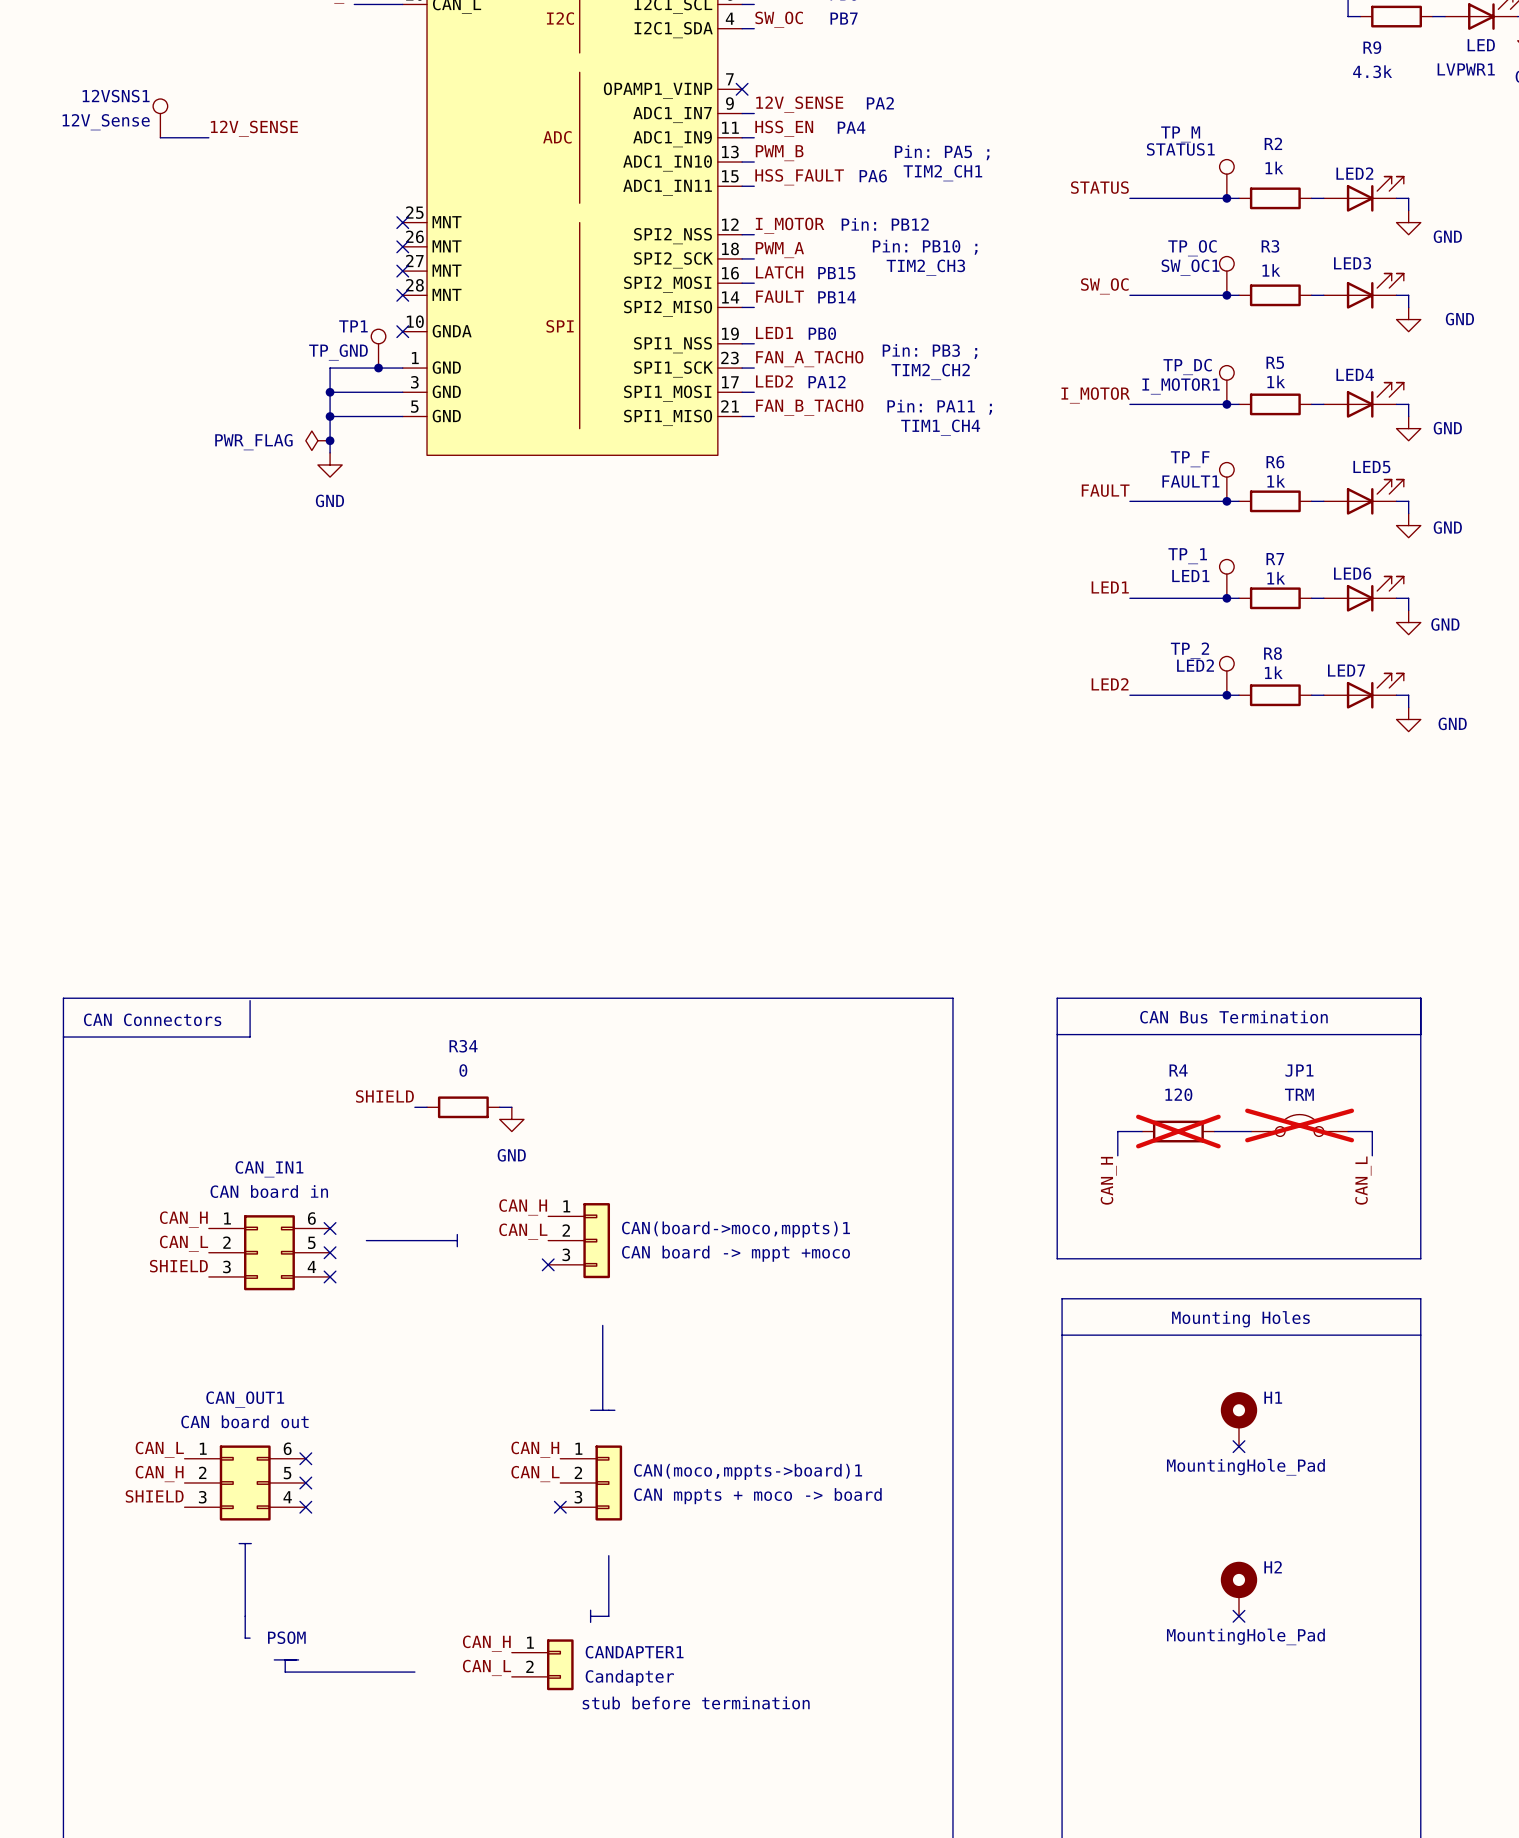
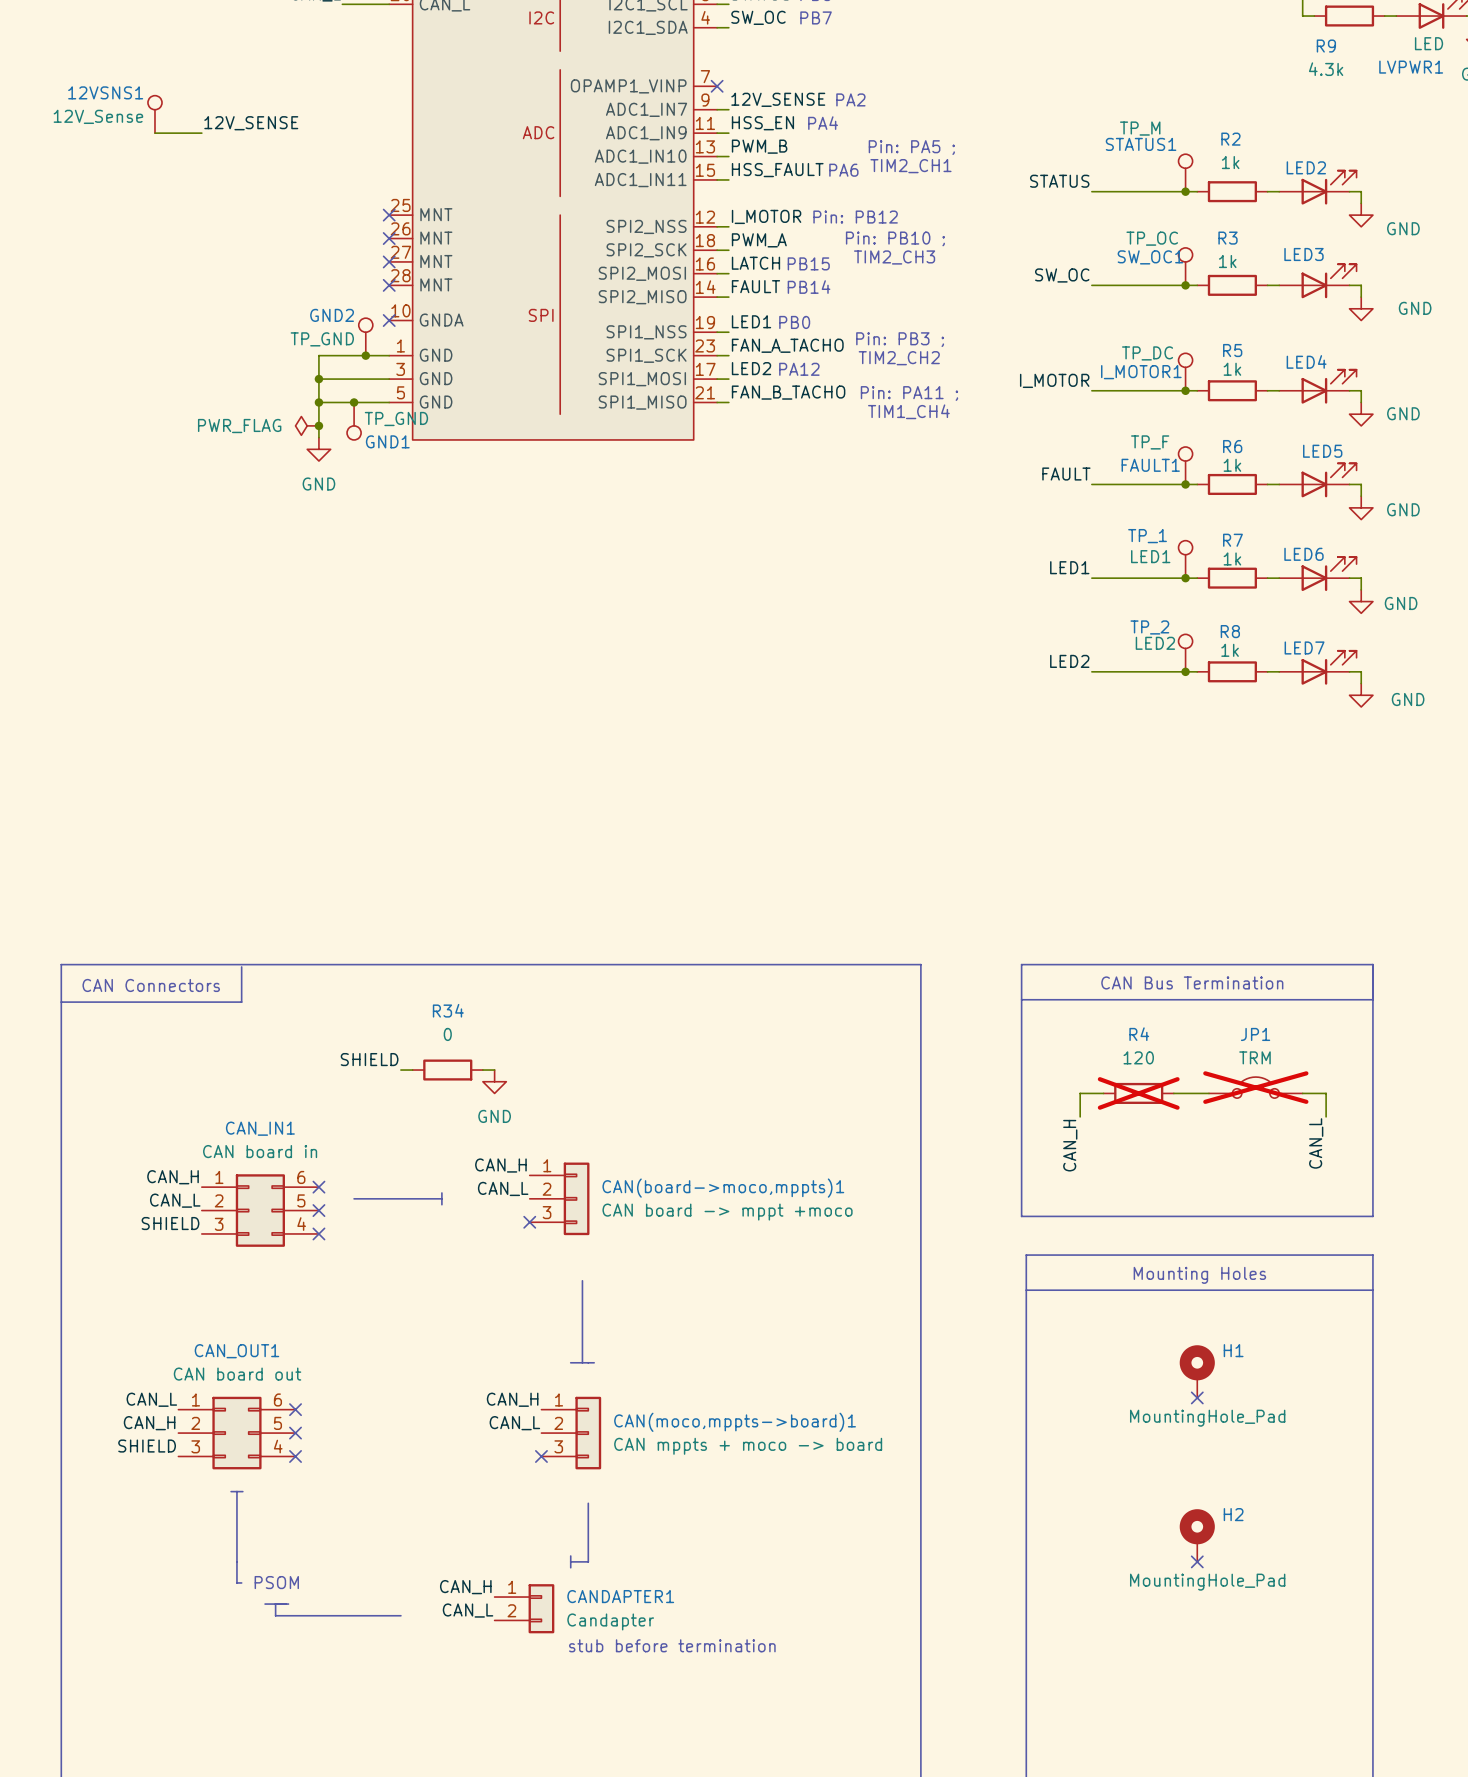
TP1 name: TP1 (353, 326) -> GND2 (332, 315)
junction: none -> (354, 402)
GND1: none -> TP_GND (354, 421)

